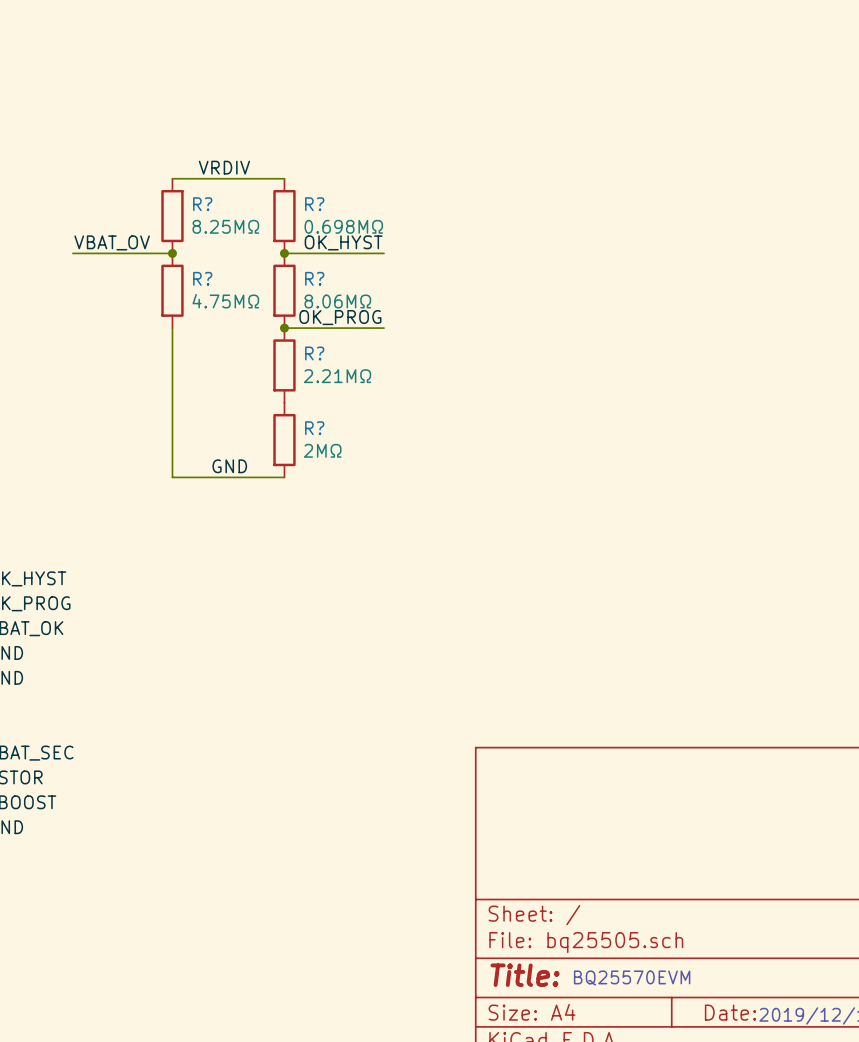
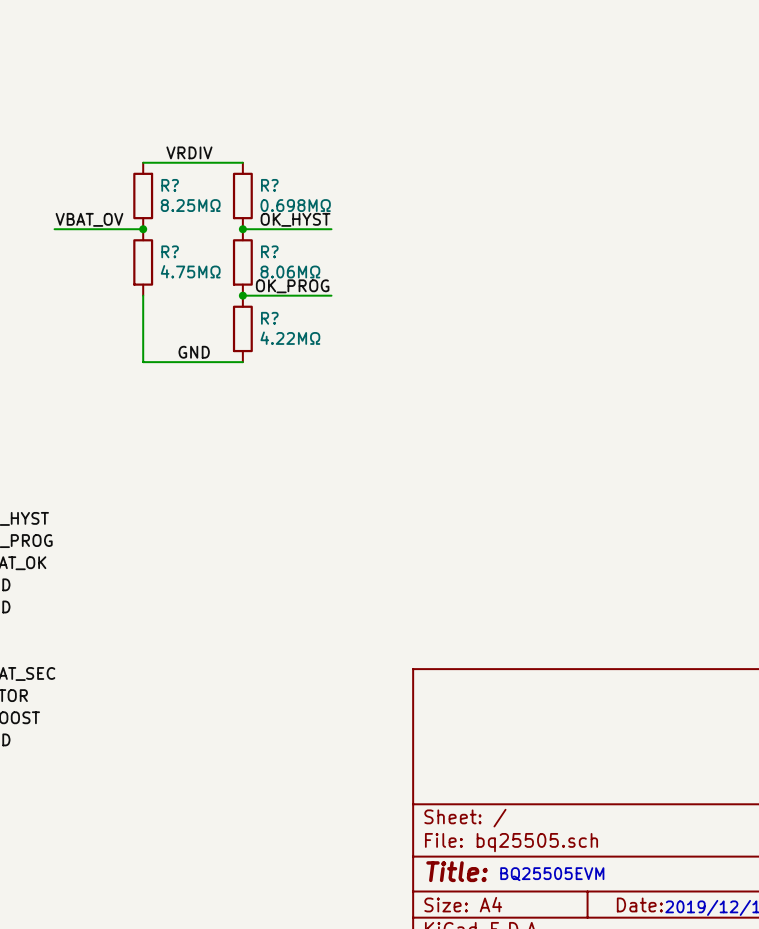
R? value: 2.21MΩ (337, 376) -> 4.22MΩ (290, 338)
wire: (172, 402) (172, 477) (284, 477) -> (143, 362) (242, 362)
R?: 2MΩ (284, 440) -> none
label position: GND (229, 466) -> GND (194, 352)
text: BQ25570EVM (632, 978) -> BQ25505EVM (552, 874)

